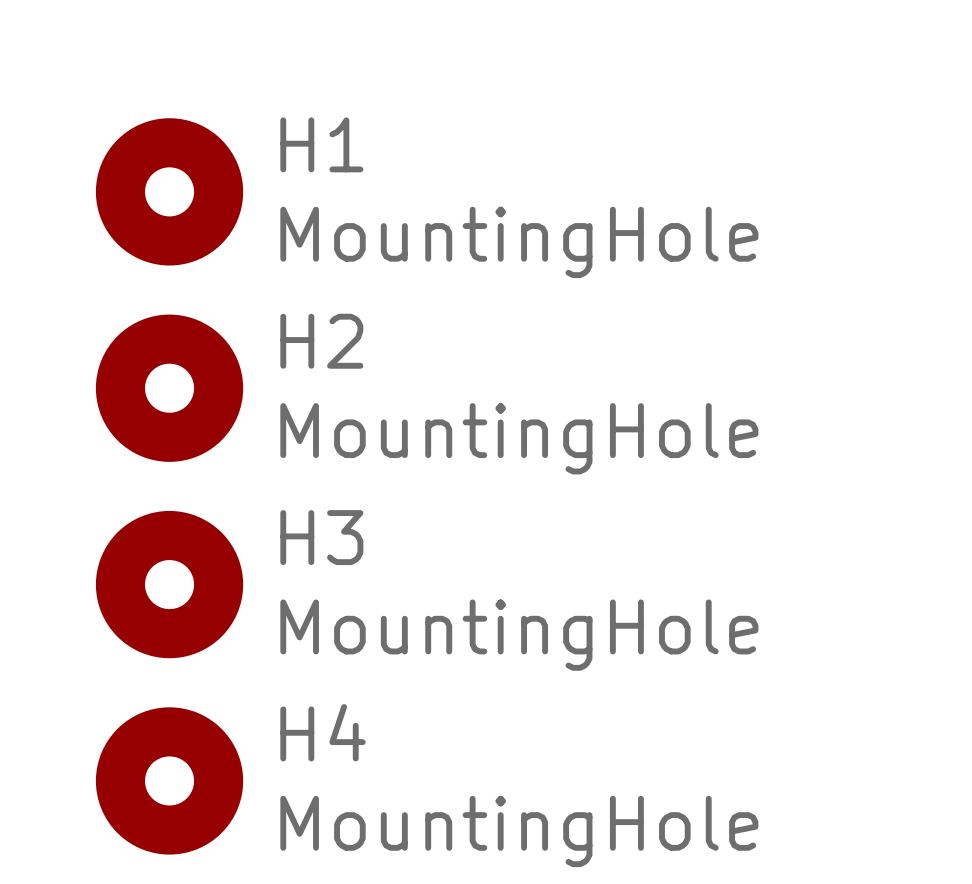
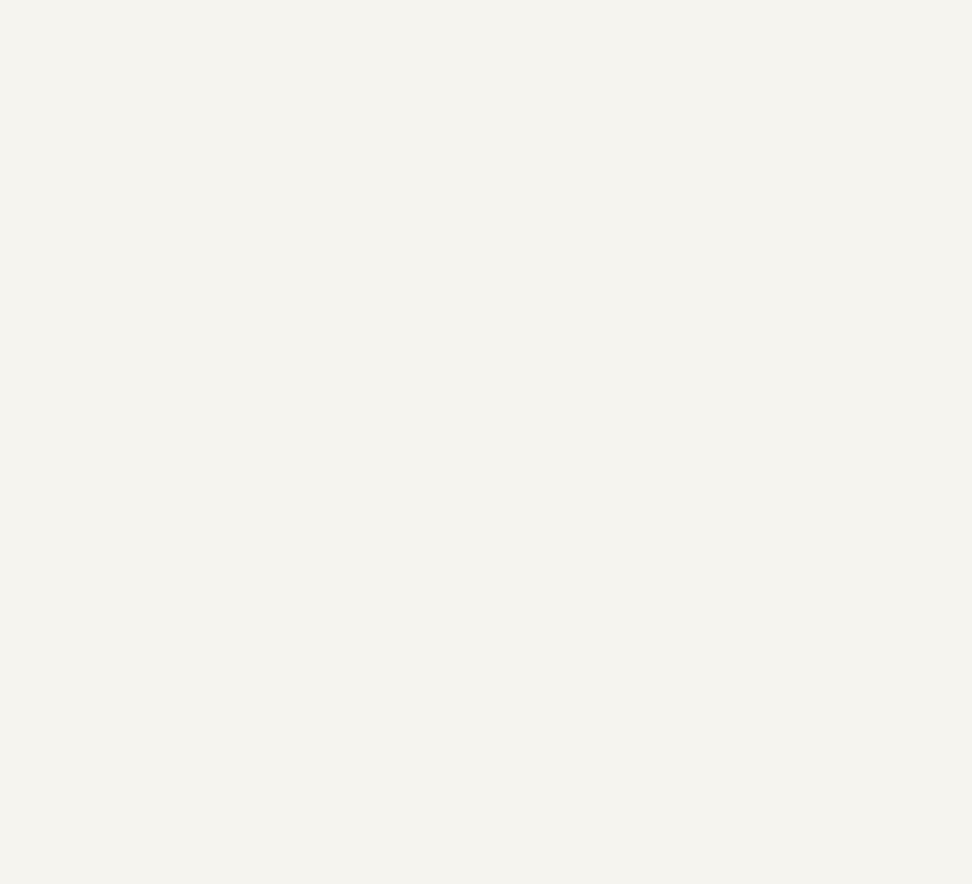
H1: MountingHole (169, 191) -> none
H2: MountingHole (169, 388) -> none
H3: MountingHole (169, 584) -> none
H4: MountingHole (169, 780) -> none

